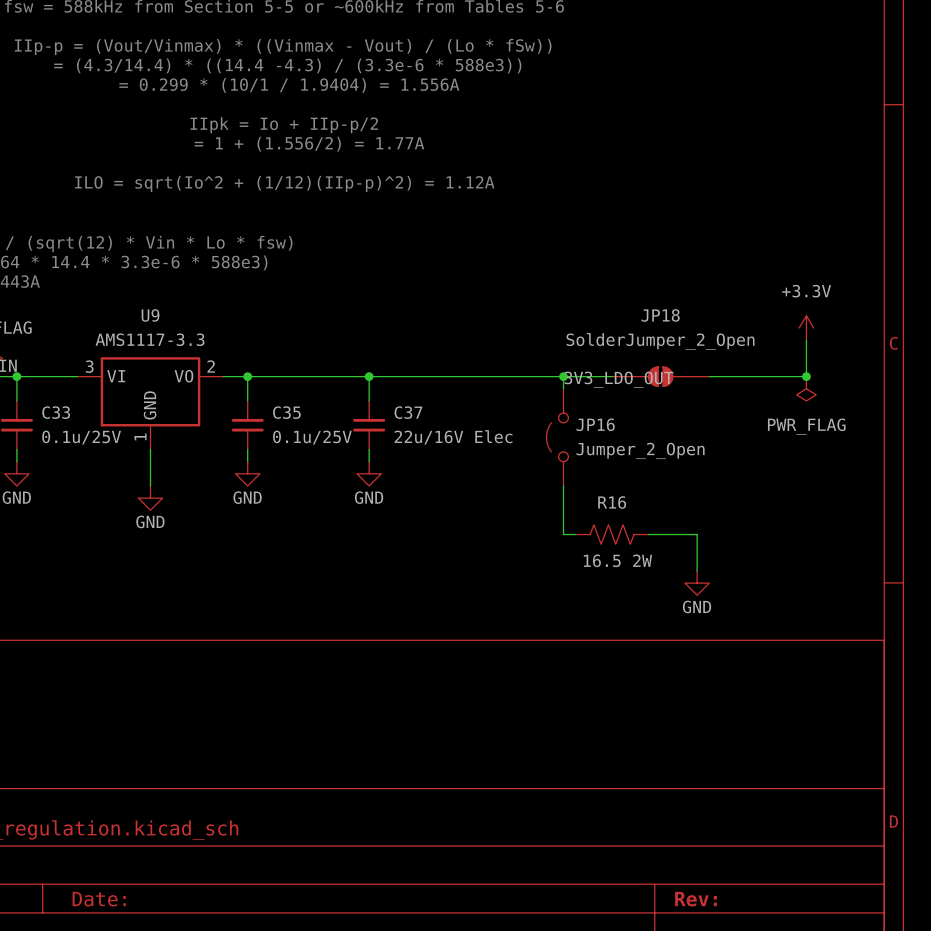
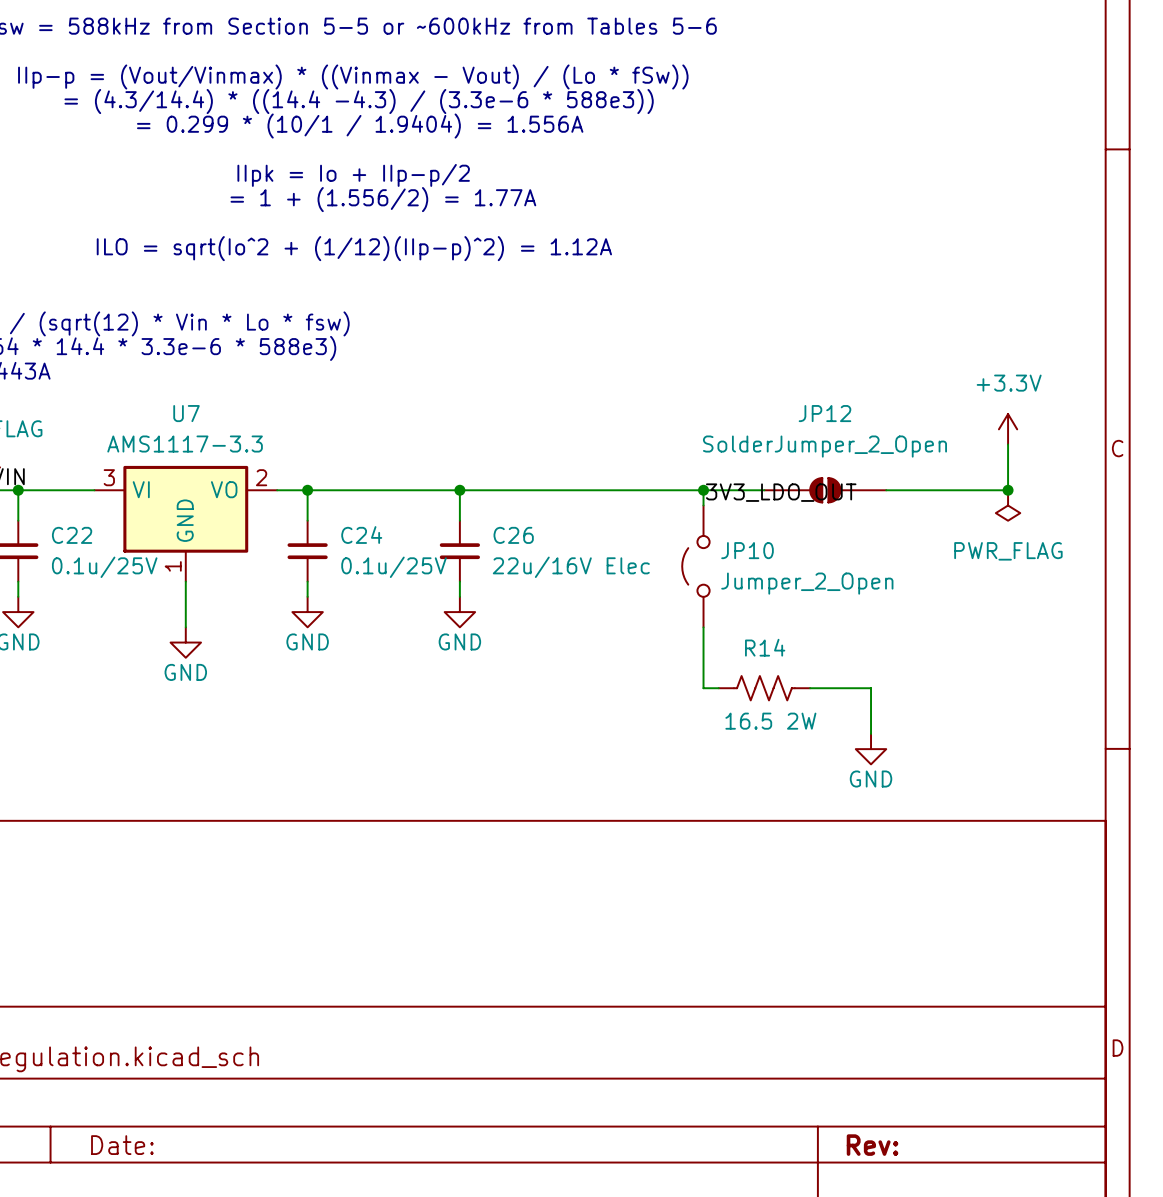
U9 name: U9 (150, 315) -> U7 (186, 413)
JP18 name: JP18 (660, 315) -> JP12 (824, 413)
C33 name: C33 (56, 412) -> C22 (72, 535)
C35 name: C35 (286, 412) -> C24 (361, 535)
C37 name: C37 (408, 412) -> C26 (513, 535)
JP16 name: JP16 (595, 424) -> JP10 (747, 550)
R16 name: R16 (612, 502) -> R14 (765, 647)

